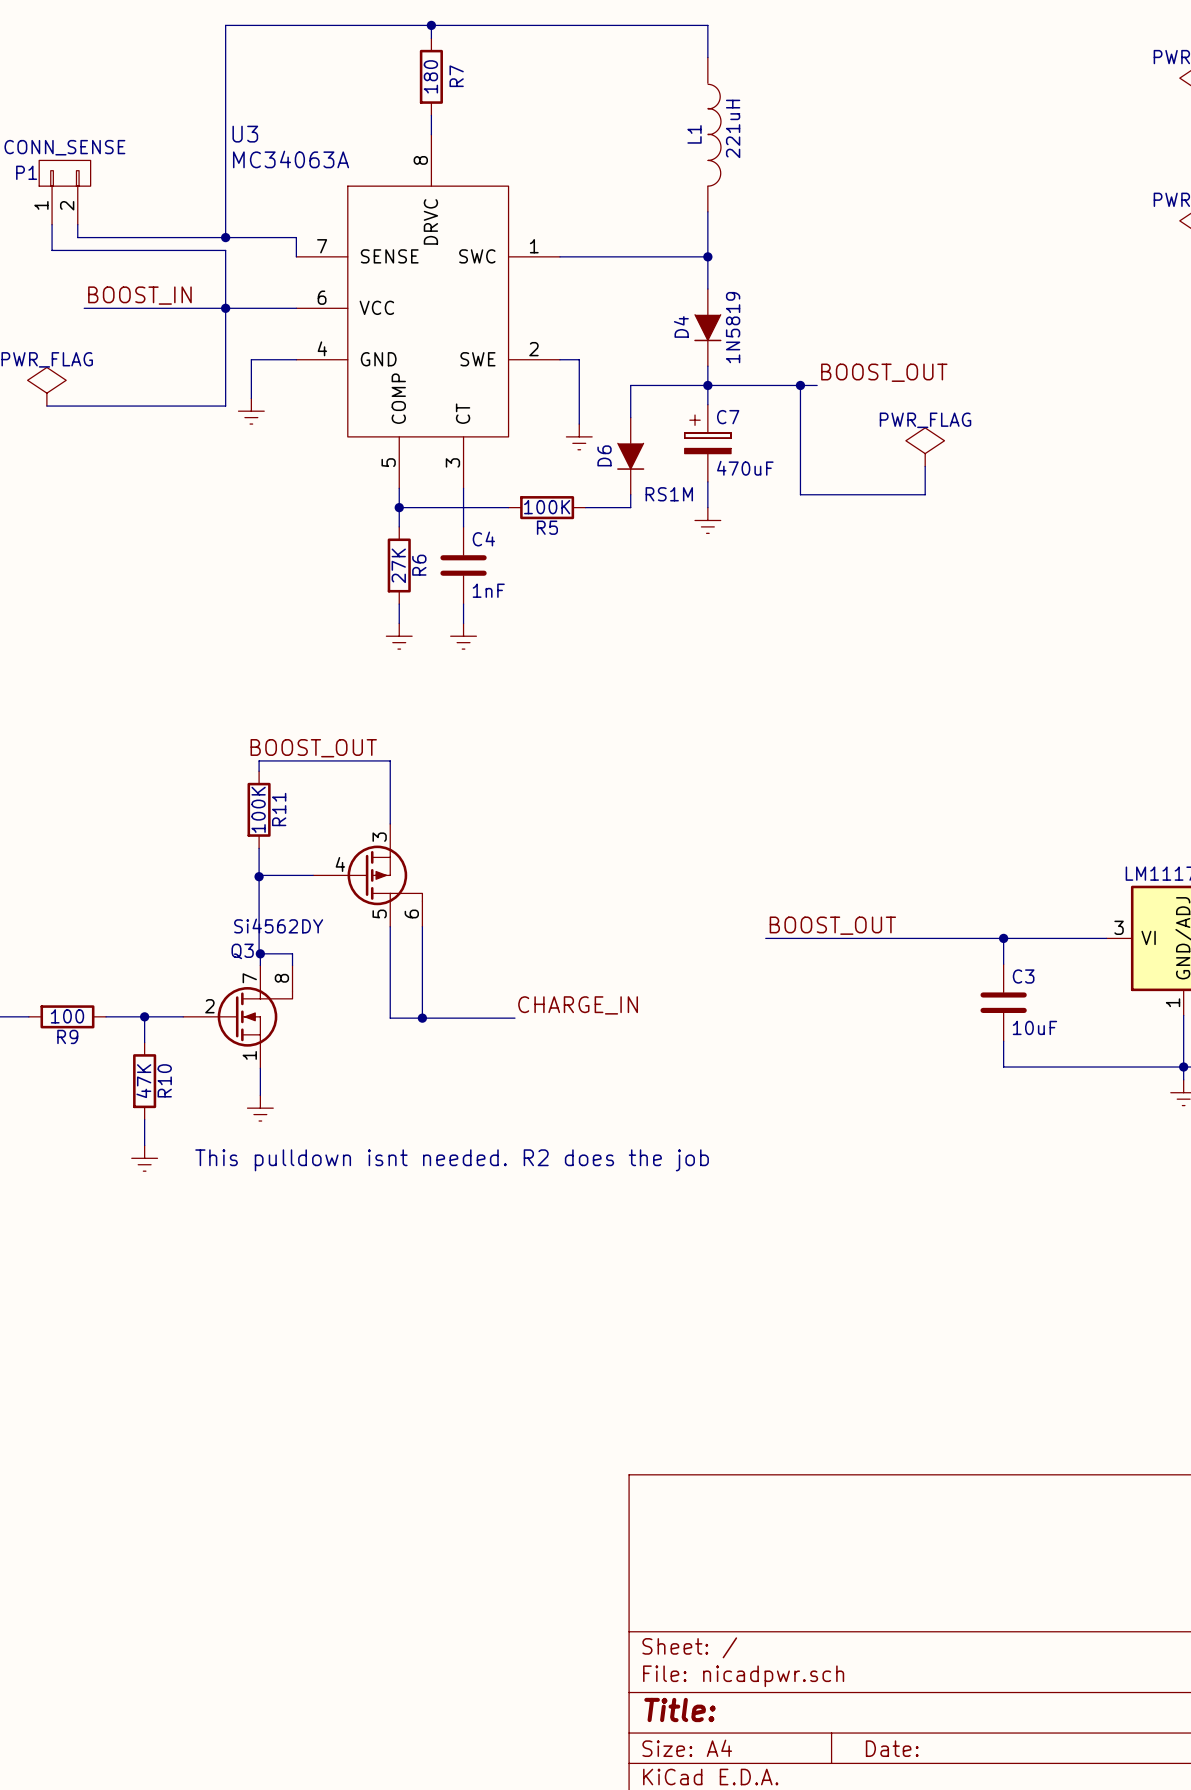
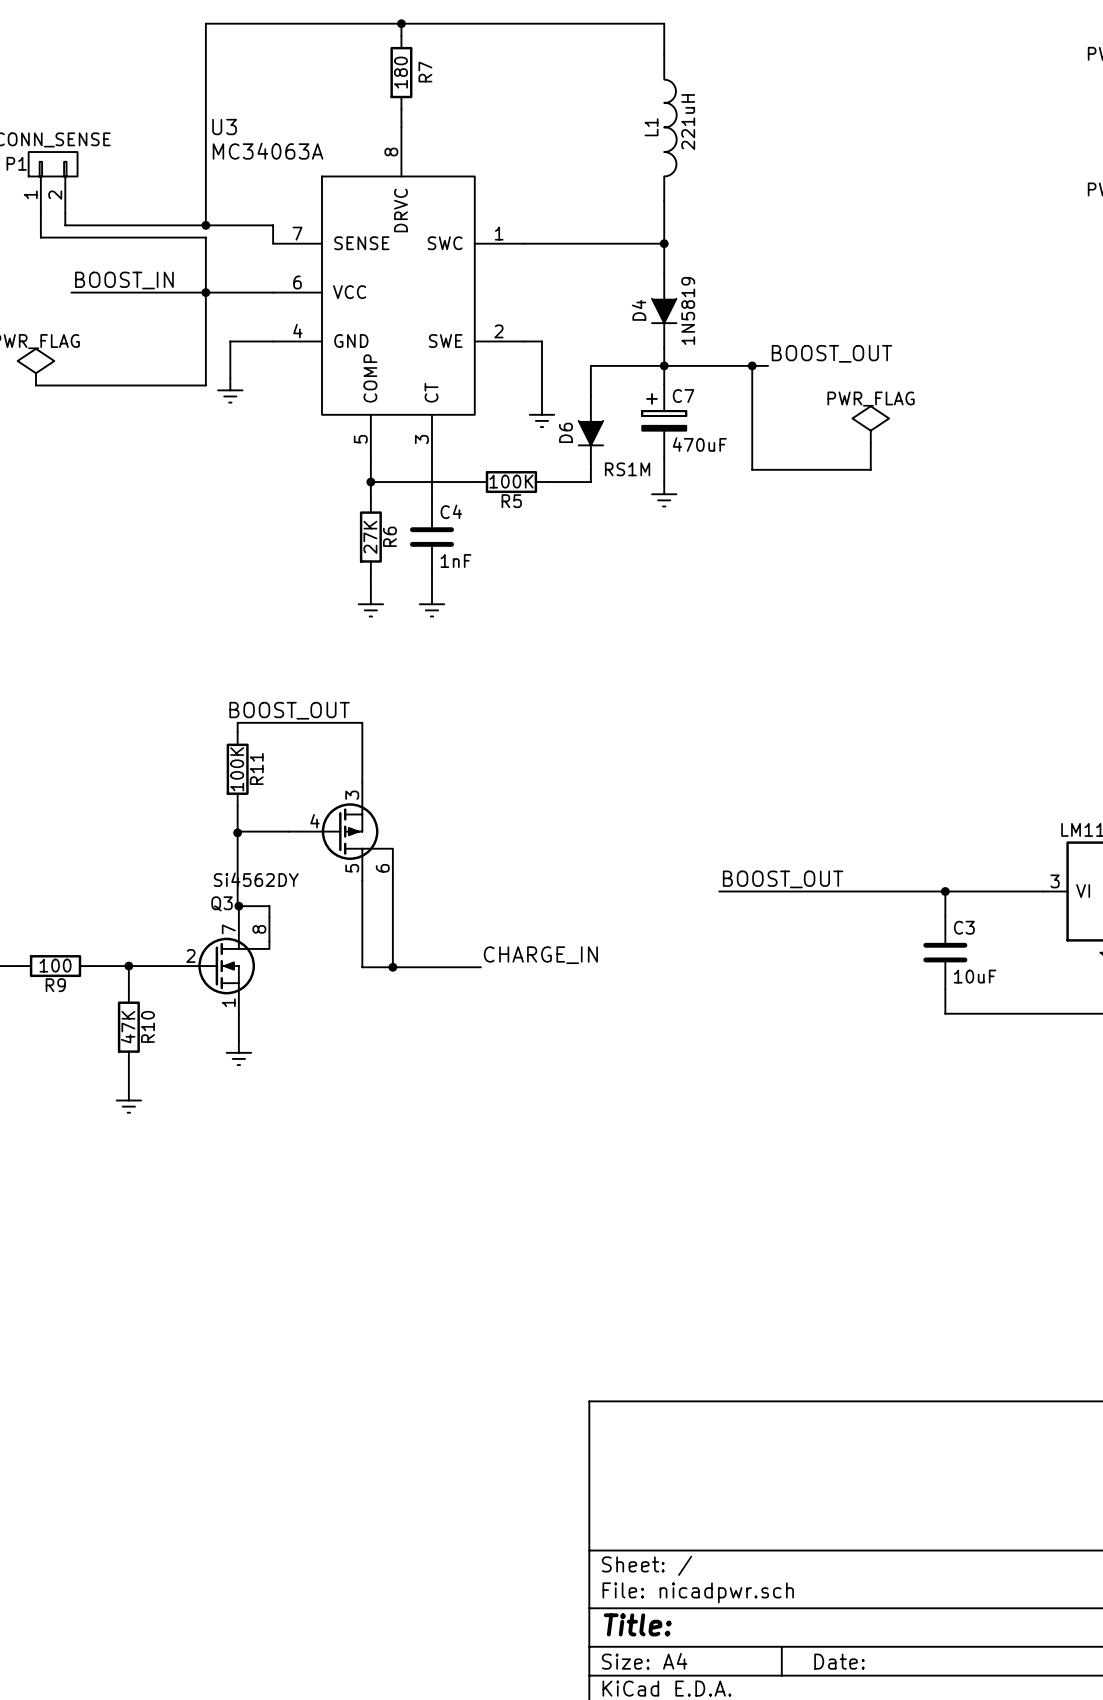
text: This pulldown isnt needed. R2 does the job (452, 1160) -> none

